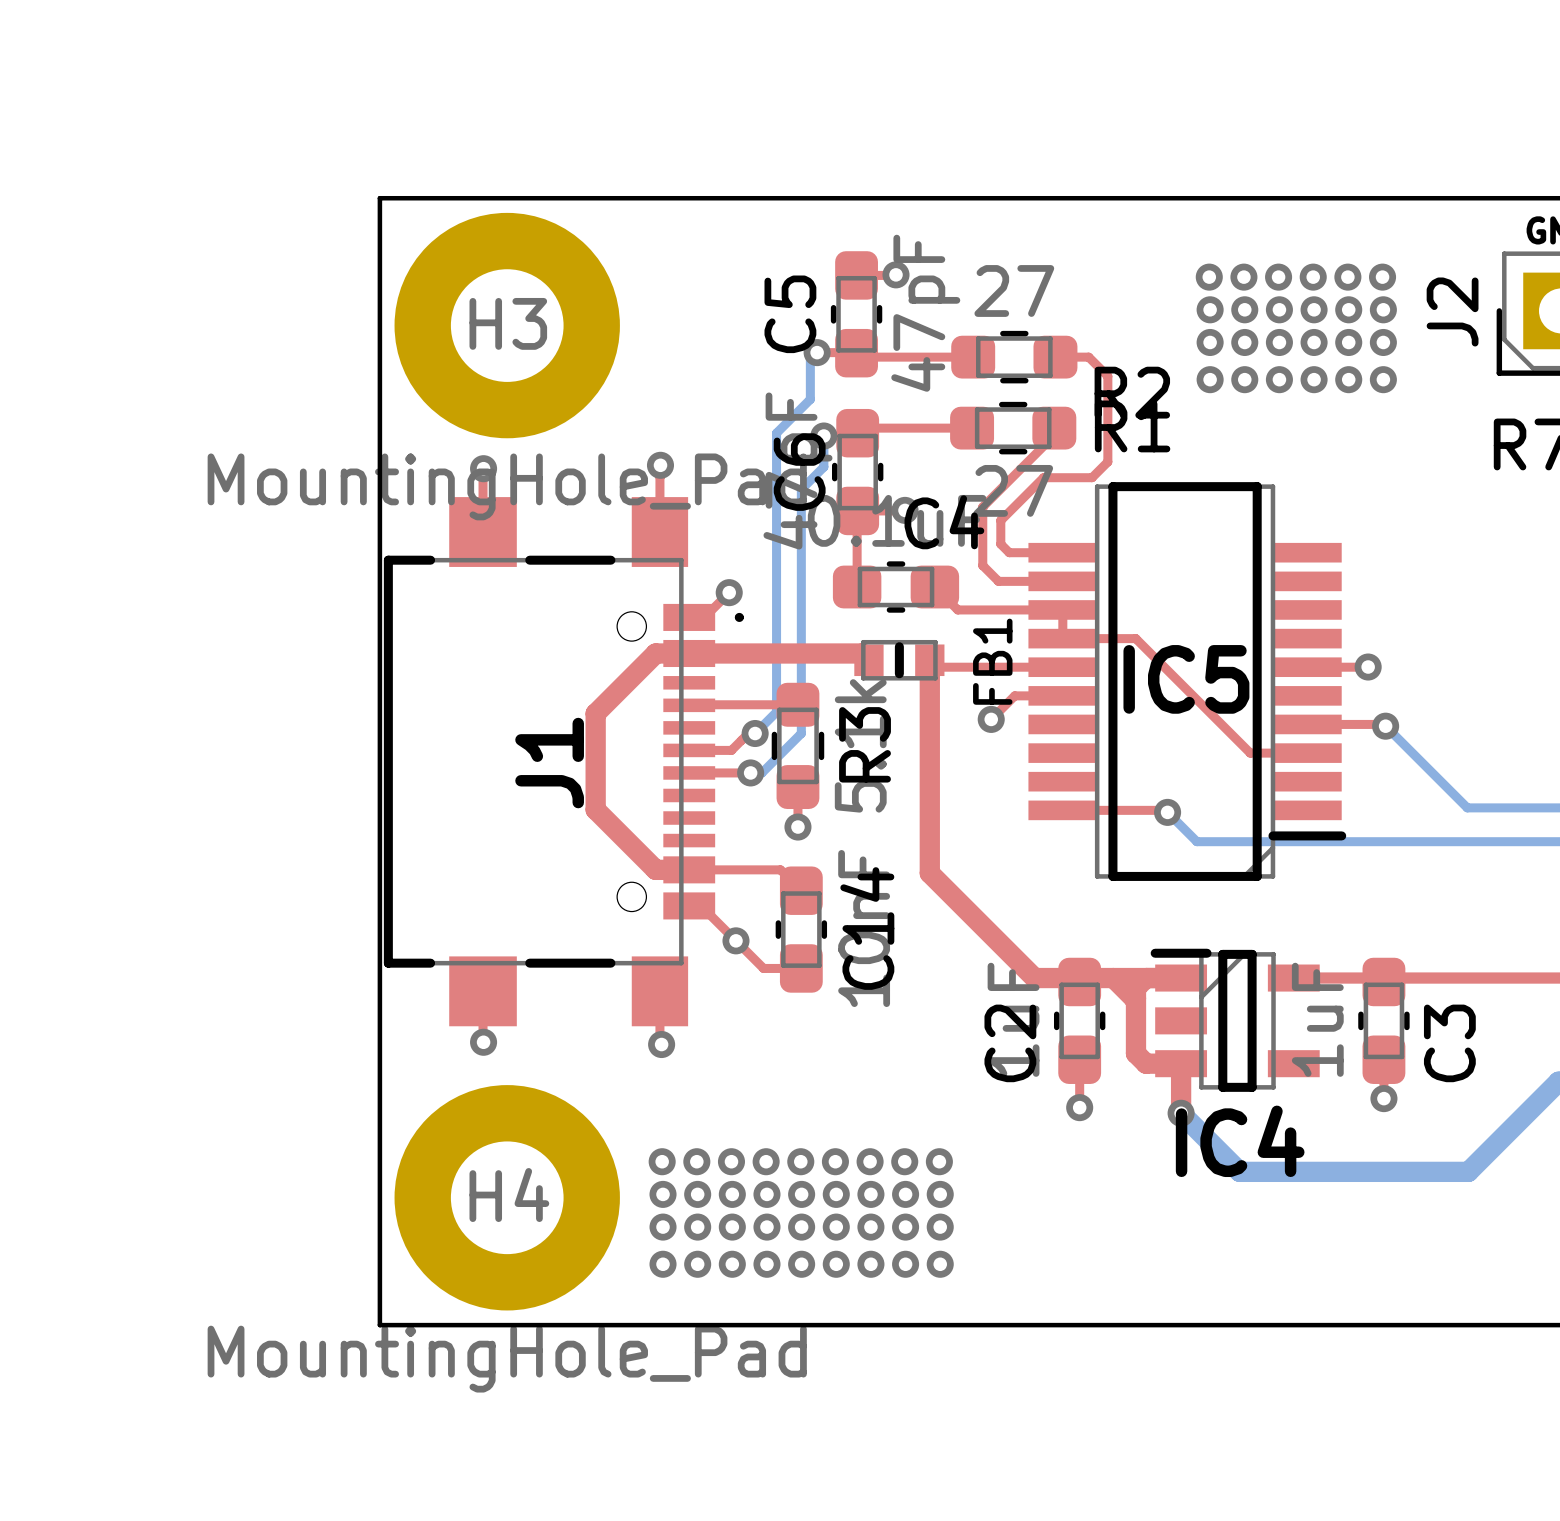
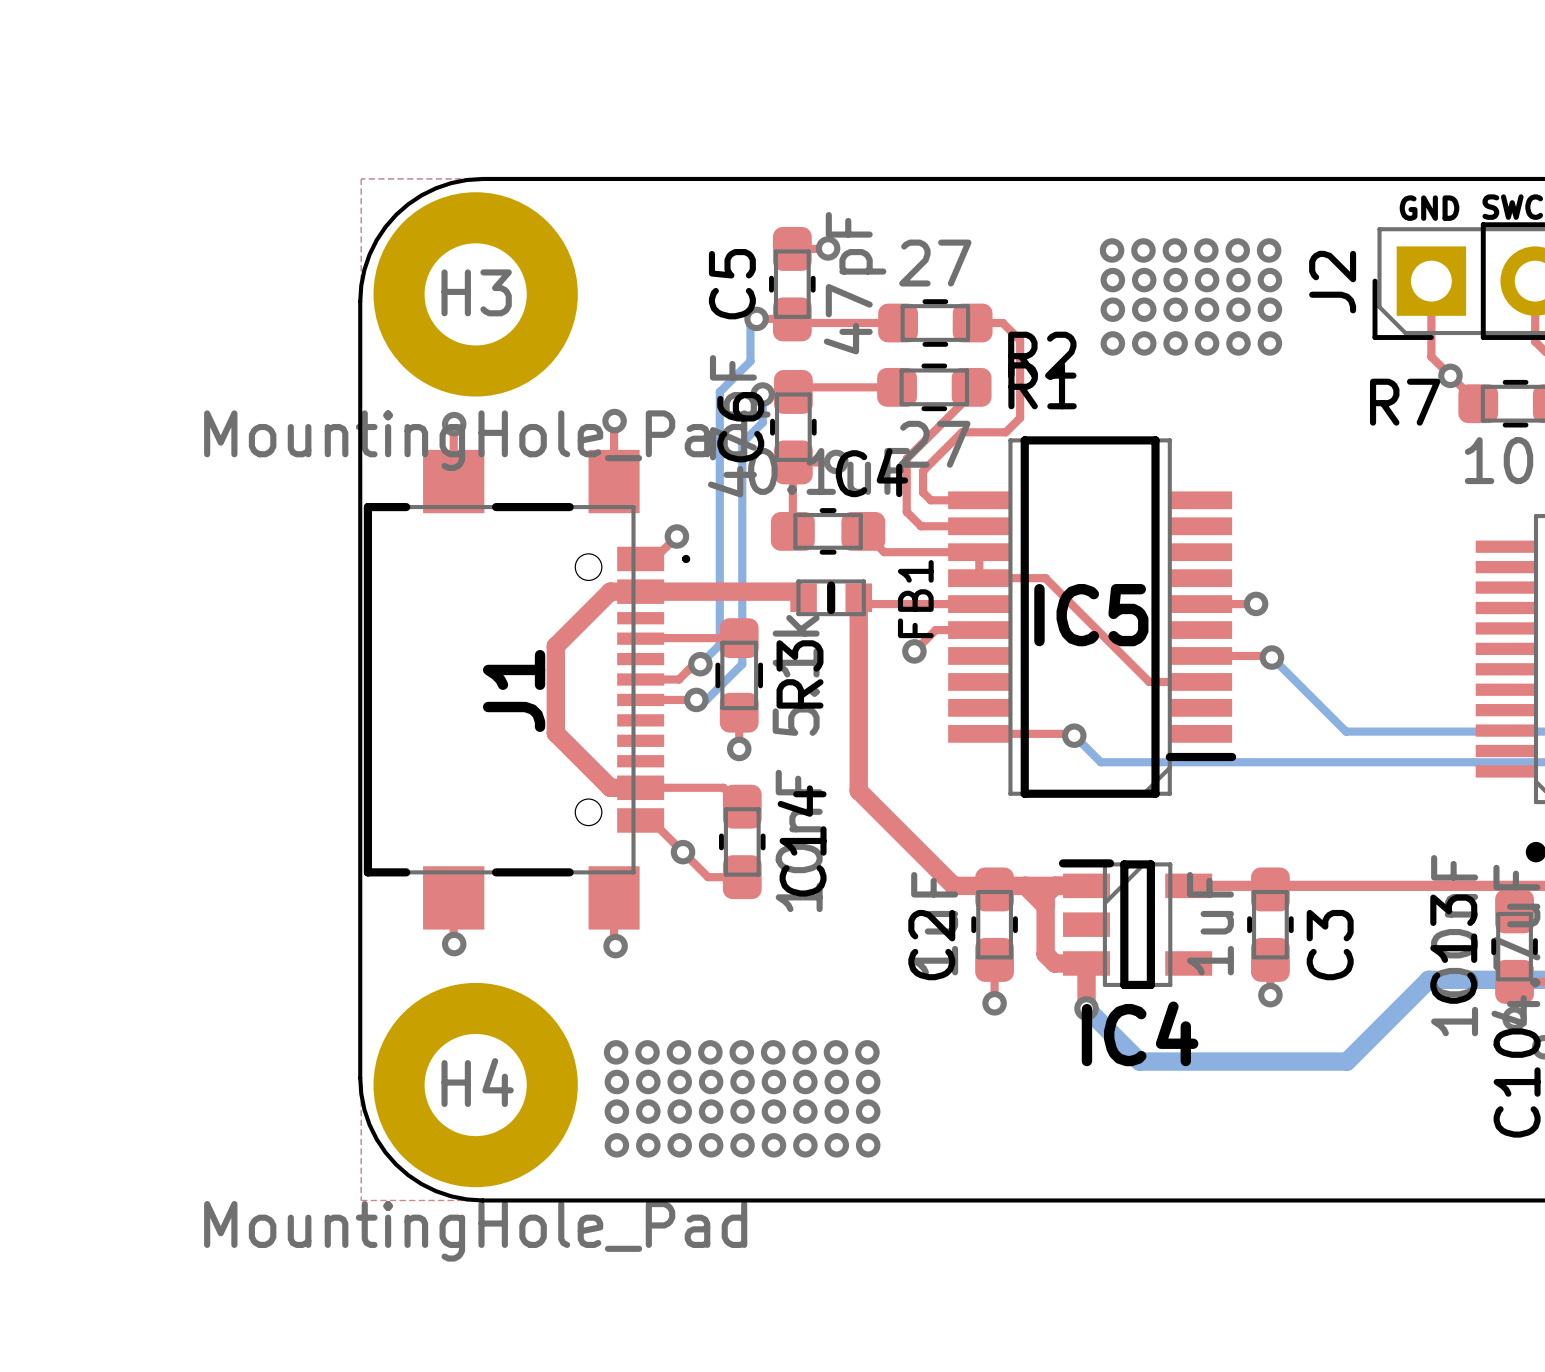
board edge: (515, 198) (379, 198) (379, 333) -> (482, 178) (466, 180) (435, 188) (408, 204) (396, 214) (385, 226) (369, 254) (361, 285) (360, 301)
board edge: (379, 1189) (379, 1325) (515, 1325) -> (360, 1077) (361, 1093) (369, 1124) (376, 1139) (396, 1164) (421, 1184) (435, 1191) (451, 1196) (482, 1200)

